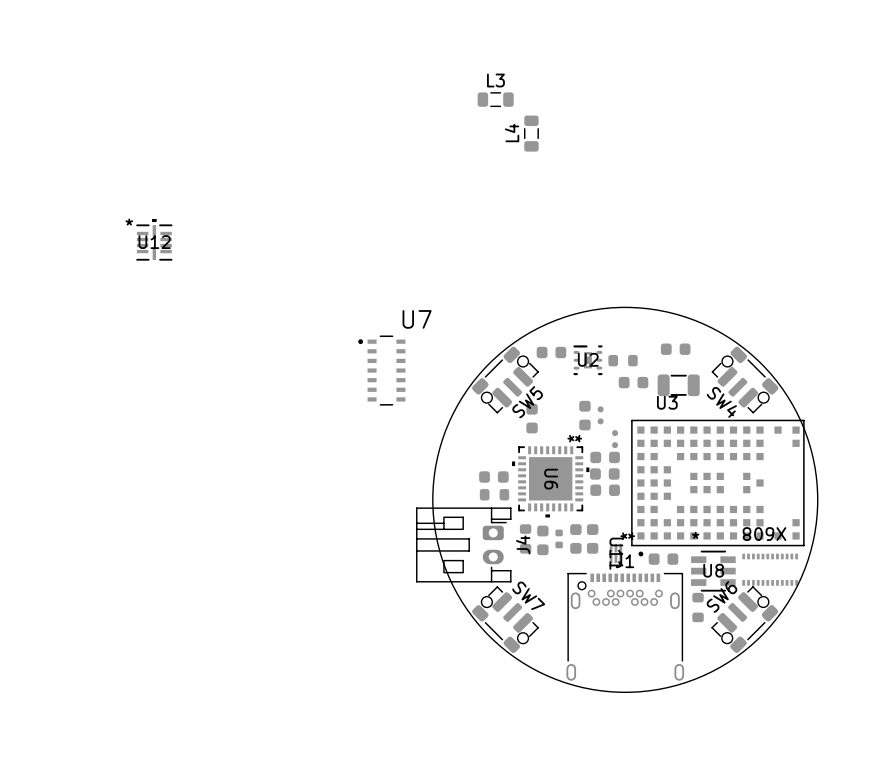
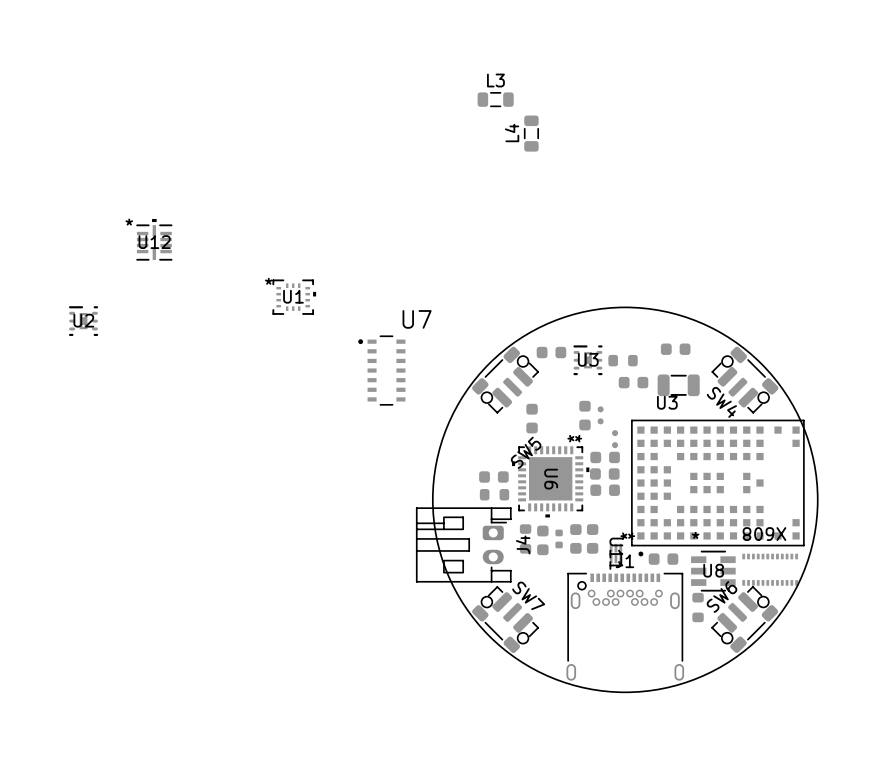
U1: none -> (294, 297)
U2: none -> (83, 321)
U2 name: U2 (588, 359) -> U3 (588, 359)
SW5 name position: SW5 (527, 402) -> SW5 (526, 452)

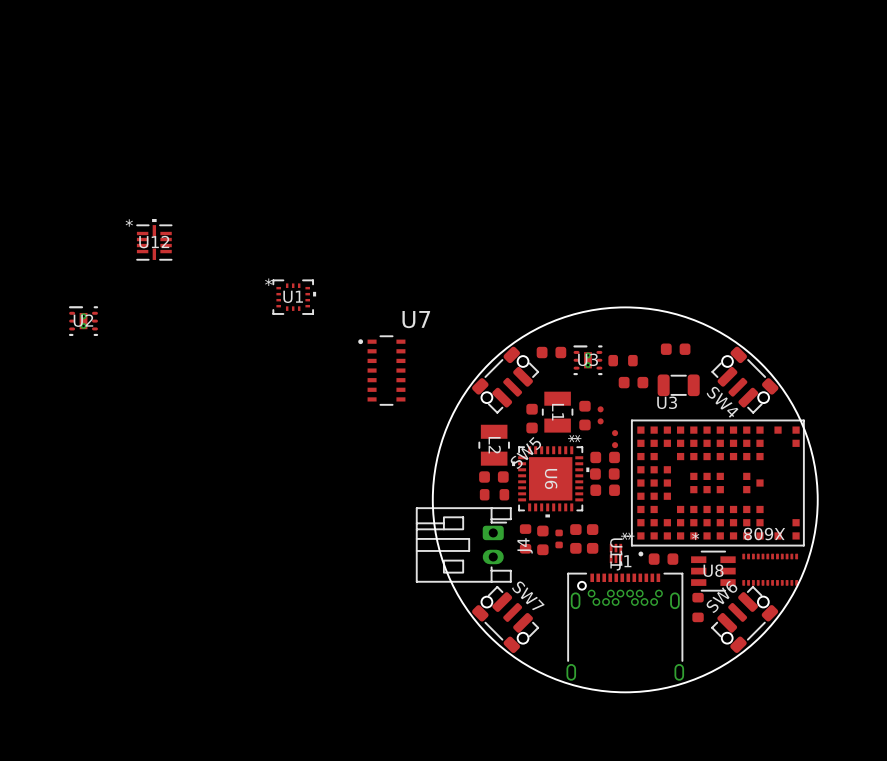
L3: (495, 99) -> none
L4: (531, 133) -> none
L1: none -> (557, 412)
L2: none -> (494, 445)

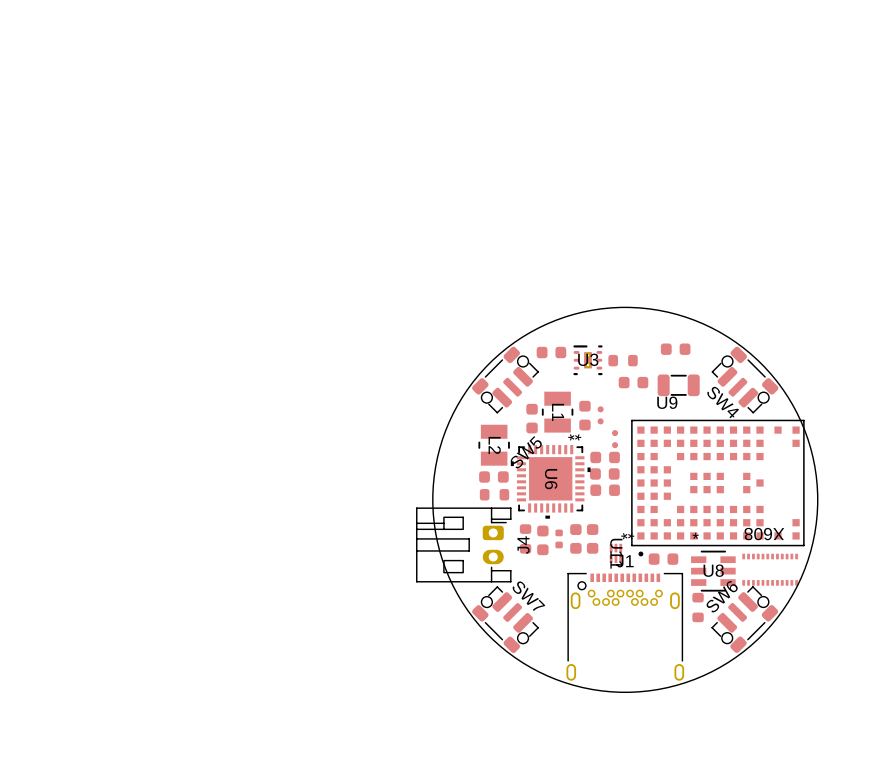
U12: (154, 239) -> none
U1: (294, 297) -> none
U2: (83, 321) -> none
U7: (381, 370) -> none
U3 name: U3 (667, 402) -> U9 (667, 402)
U6 footprint: [512, 446, 590, 518] -> [510, 445, 591, 519]

